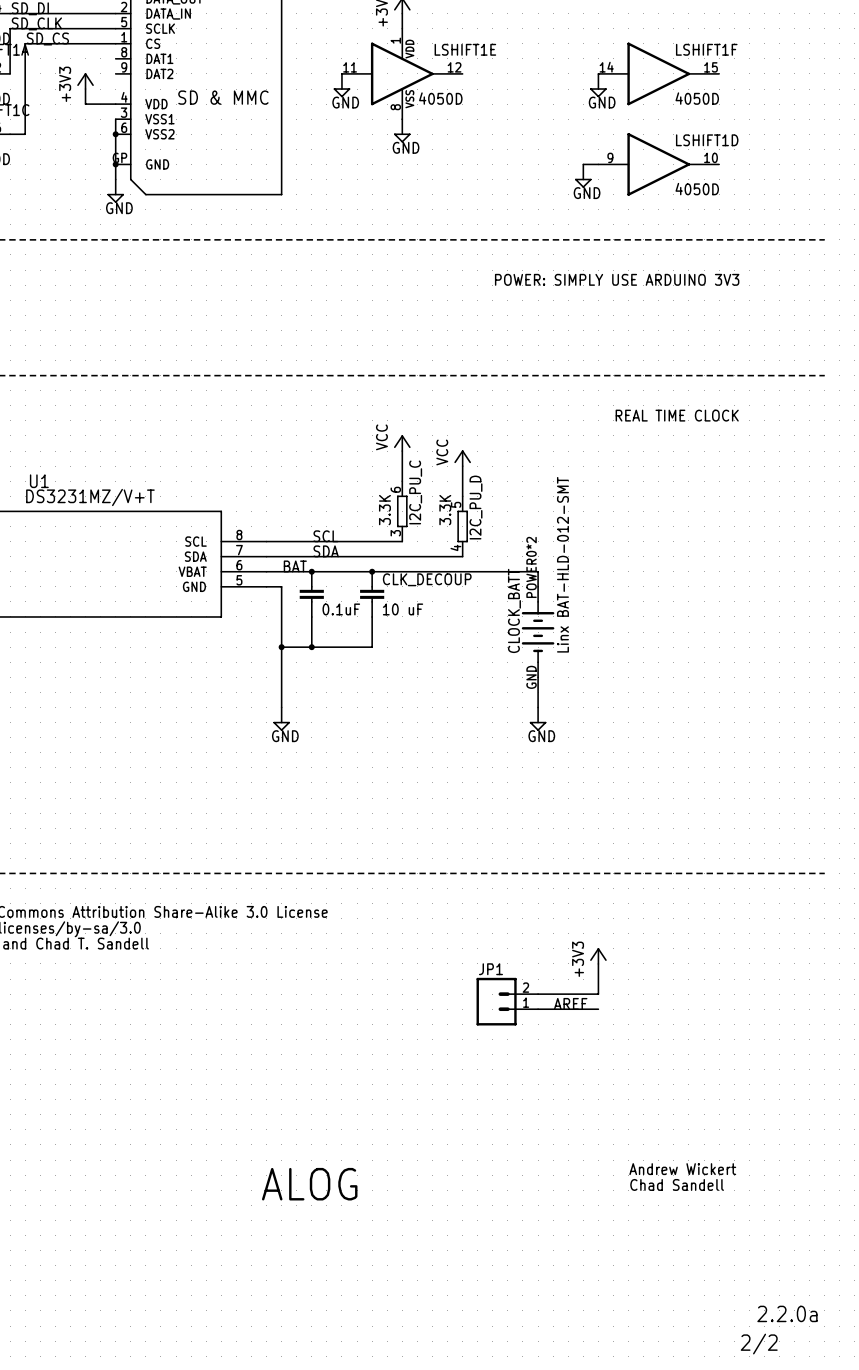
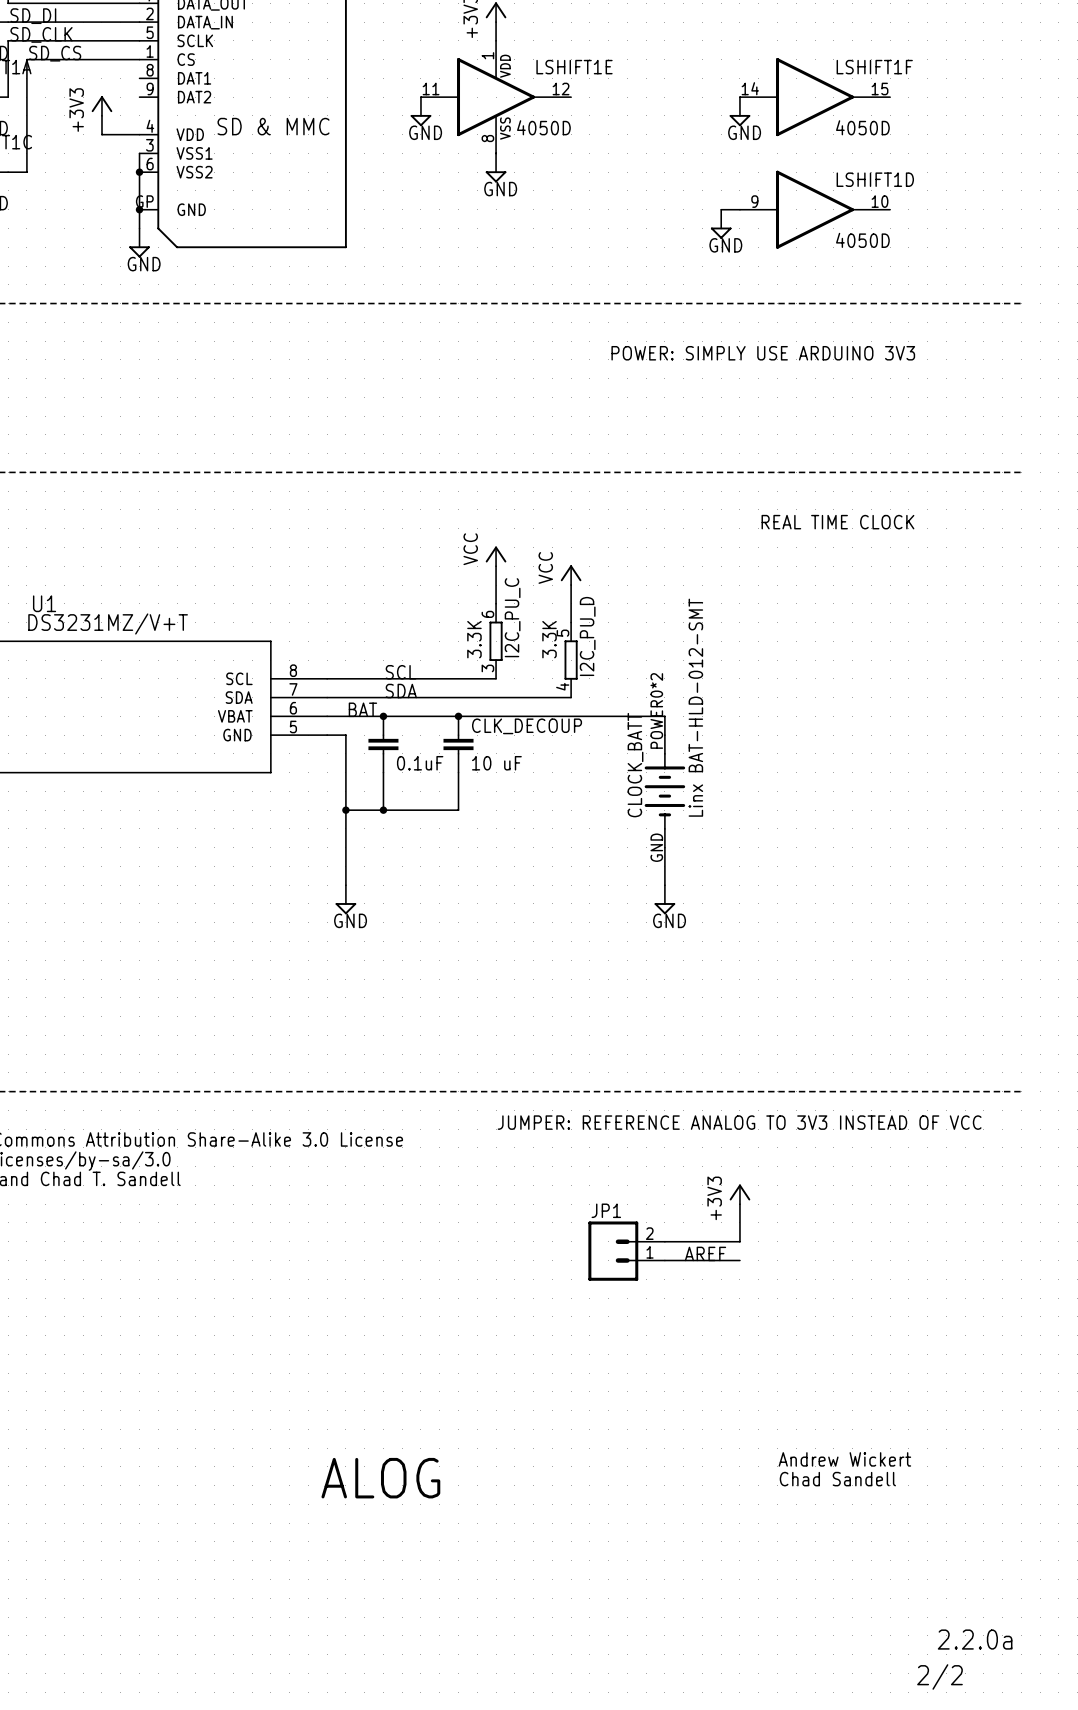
text: none -> JUMPER: REFERENCE ANALOG TO 3V3 INSTEAD OF VCC (739, 1122)

